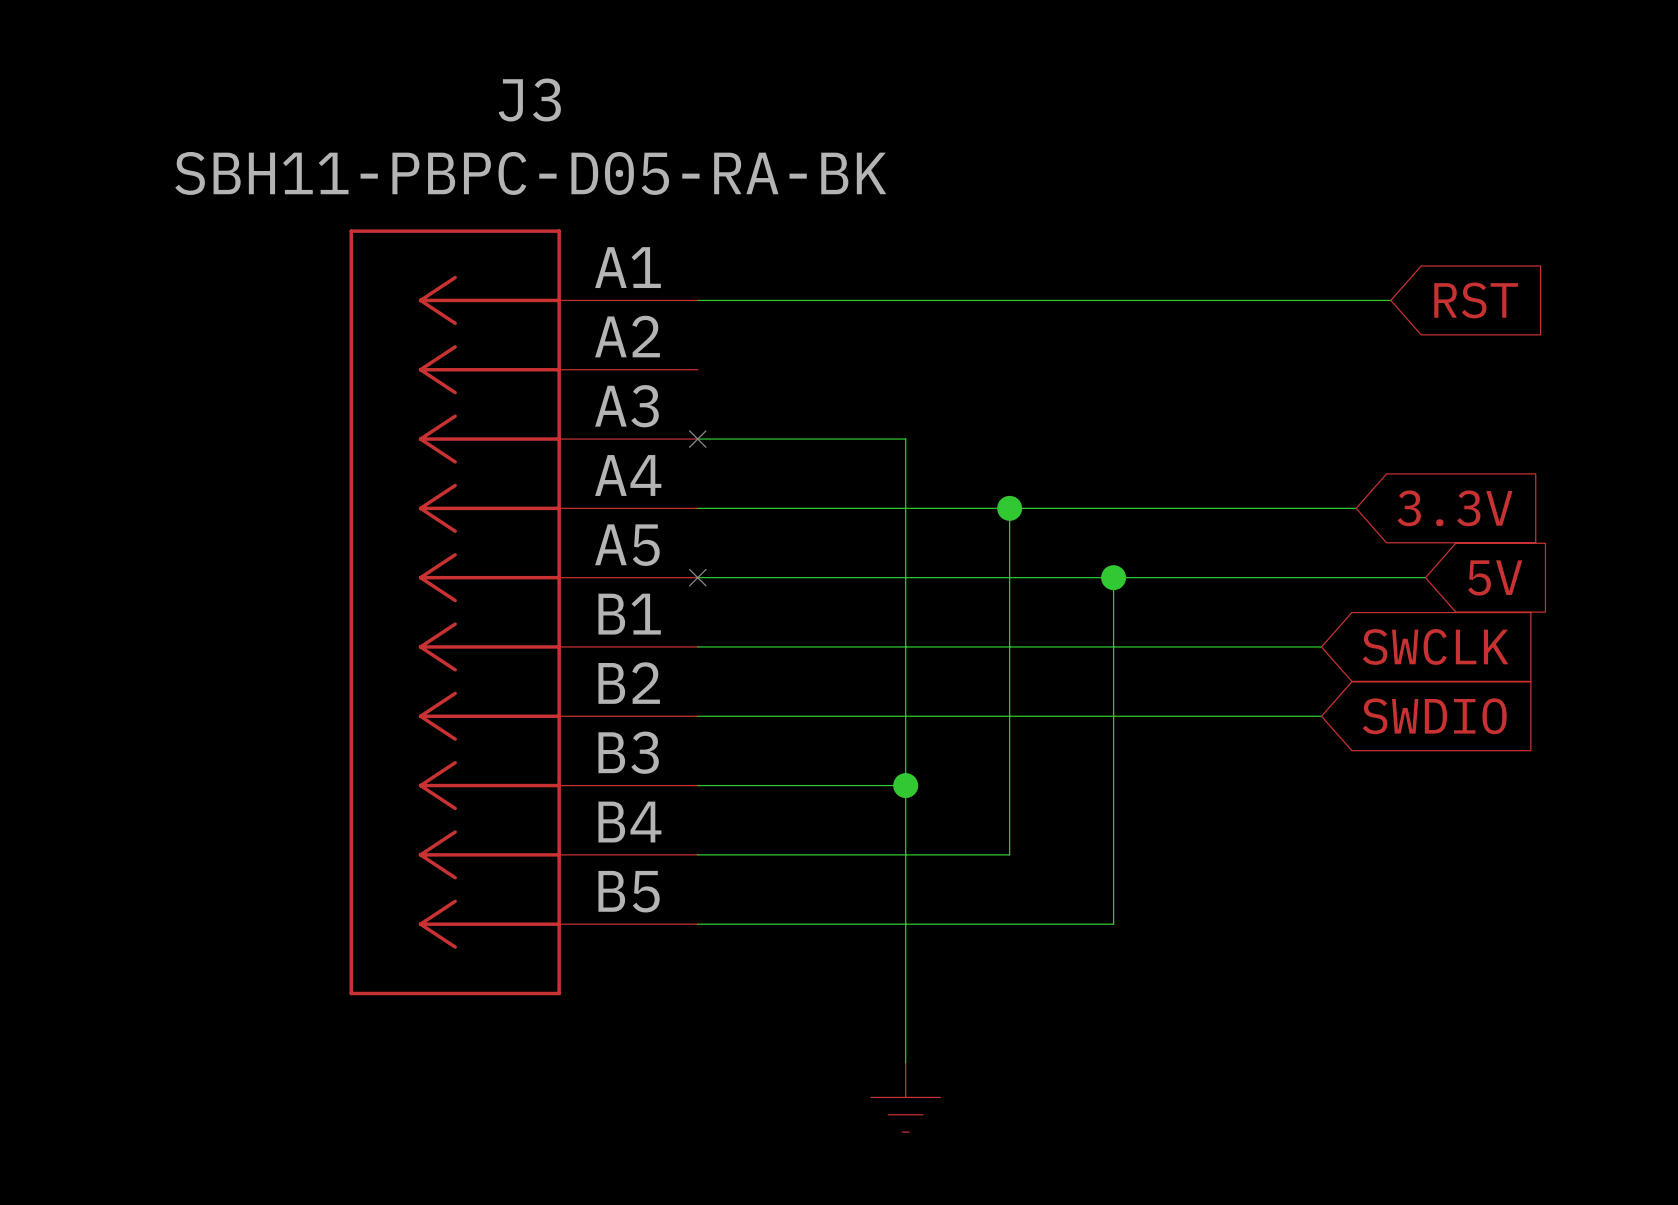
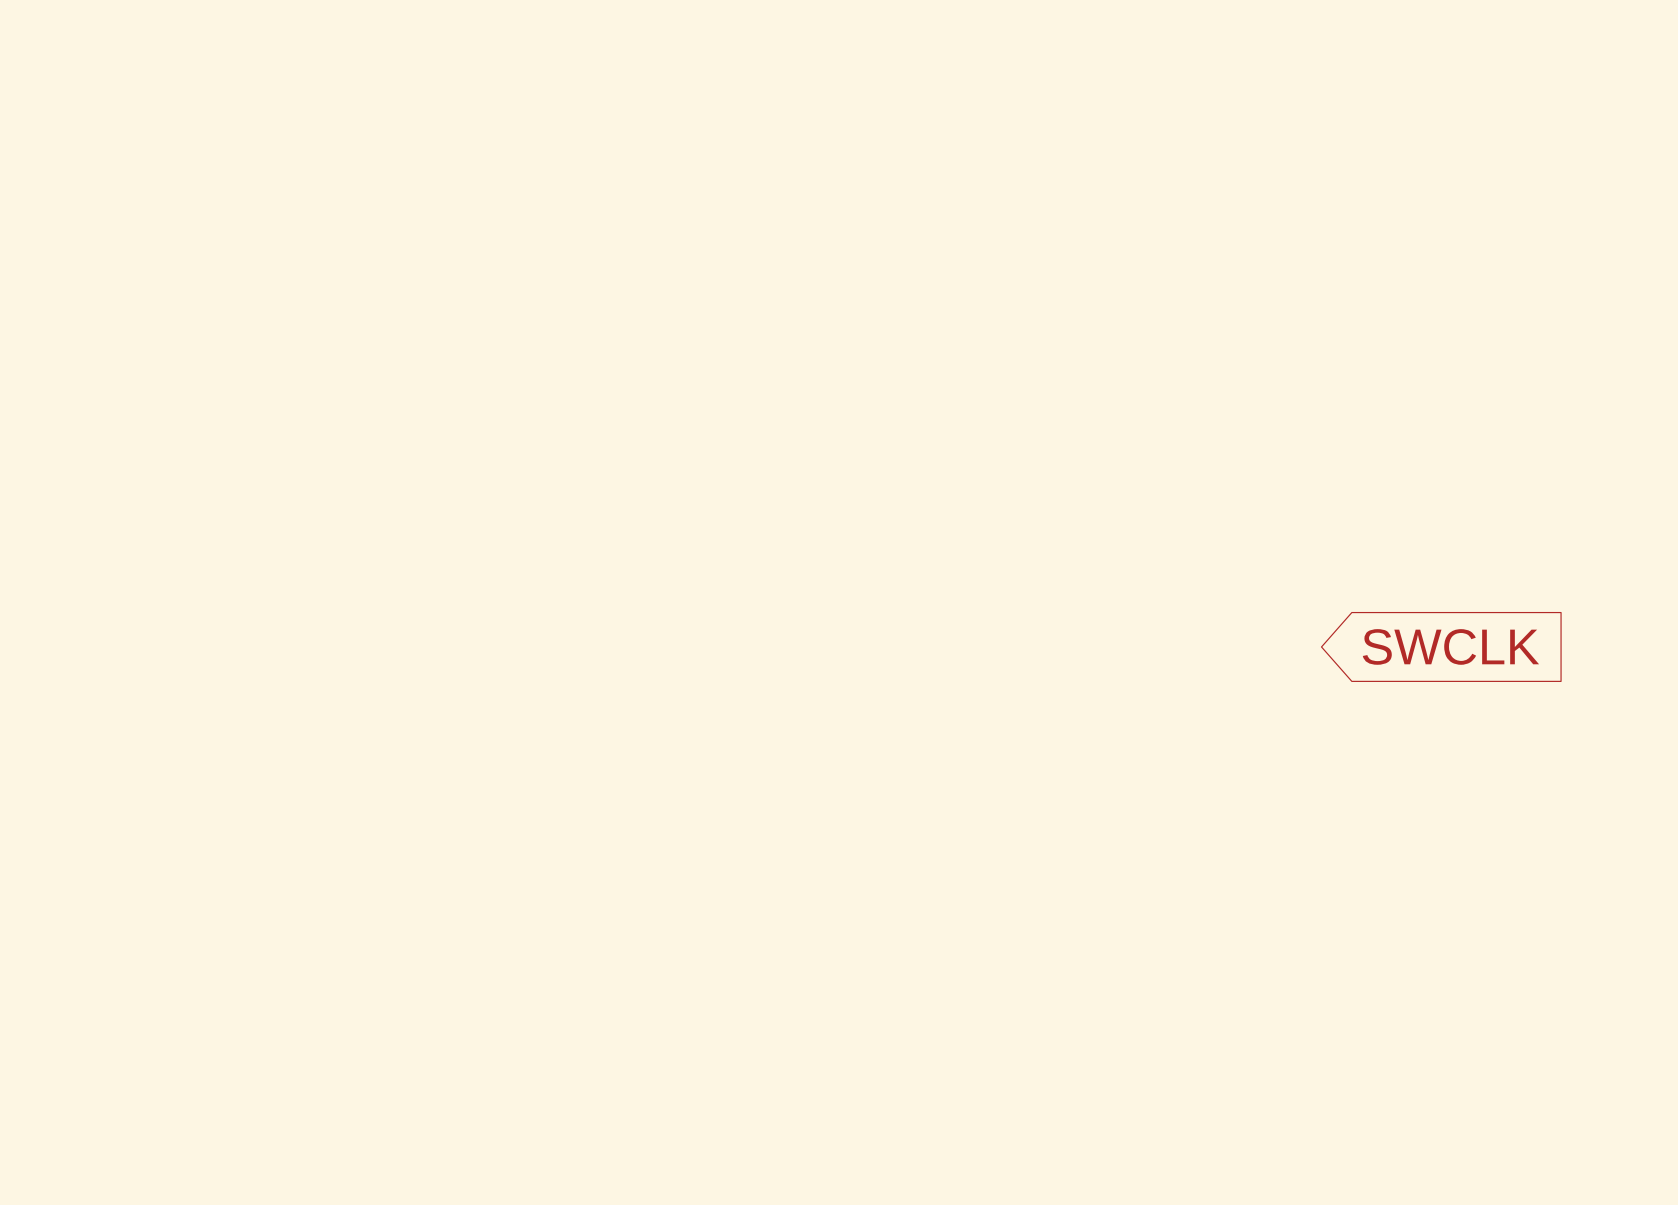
wire: (697, 300) (1390, 300) -> none
global label: RST (1476, 300) -> none
wire: (697, 439) (905, 439) (905, 1062) -> none
wire: (697, 508) (1356, 508) -> none
wire: (1009, 508) (1009, 854) (697, 854) -> none
junction: (1009, 508) -> none
global label: 3.3V (1455, 508) -> none
wire: (697, 577) (1425, 577) -> none
wire: (1113, 577) (1113, 924) (697, 924) -> none
junction: (1113, 577) -> none
global label: 5V (1495, 577) -> none
J3: SBH11-PBPC-D05-RA-BK (527, 612) -> none
wire: (697, 646) (1321, 646) -> none
wire: (697, 716) (1321, 716) -> none
global label: SWDIO (1434, 716) -> none
wire: (697, 785) (905, 785) -> none
junction: (905, 785) -> none
power symbol: (905, 1097) -> none

